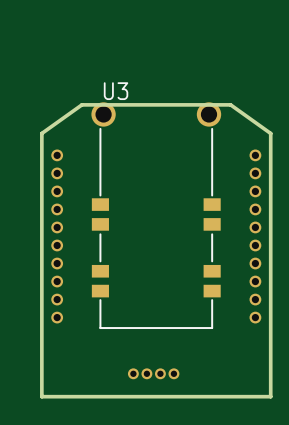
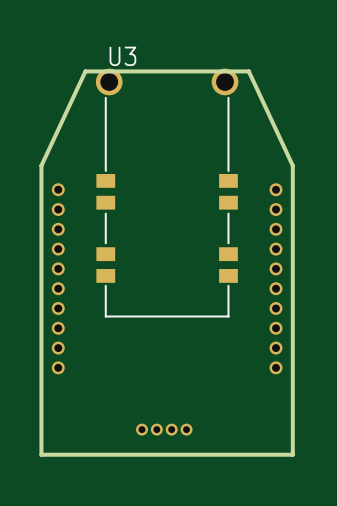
board edge: (270, 133) (230, 104) (81, 104) (41, 133) -> (292, 165) (248, 71) (85, 71) (41, 165)
U3 position: (156, 215) -> (167, 193)

